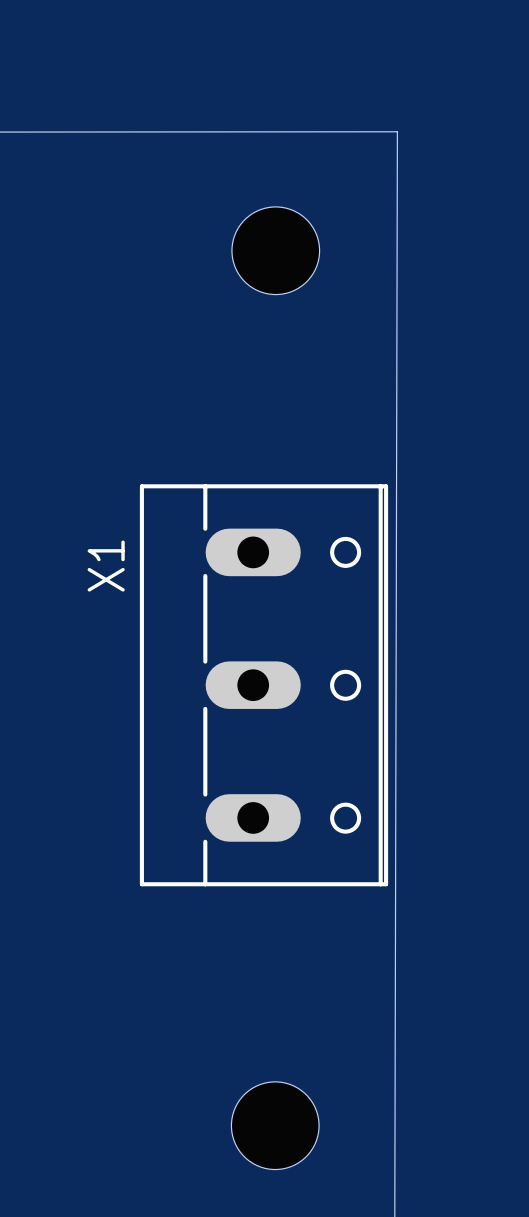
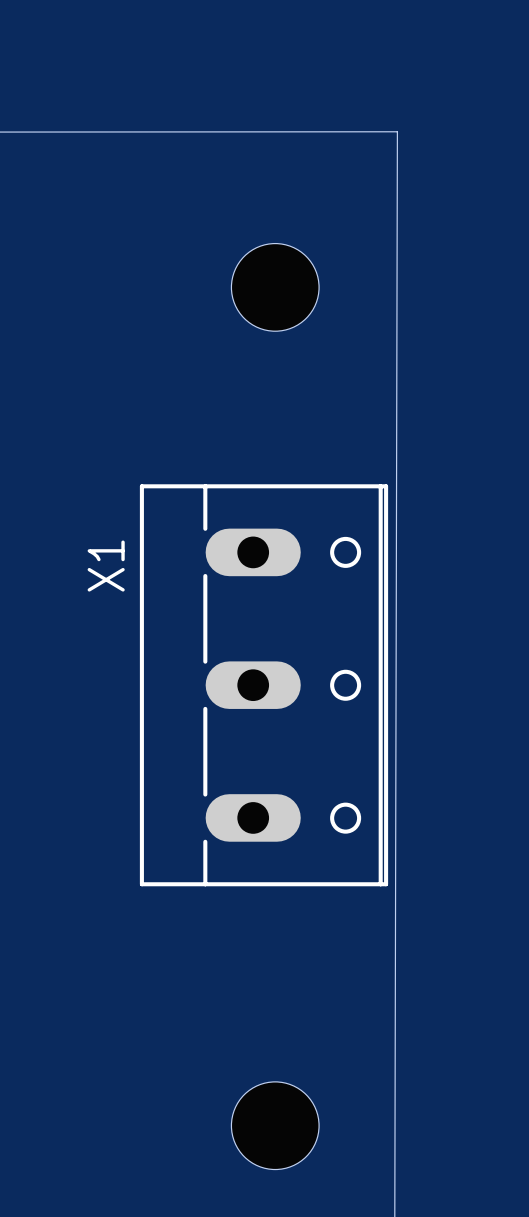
part position: (275, 250) -> (275, 287)

